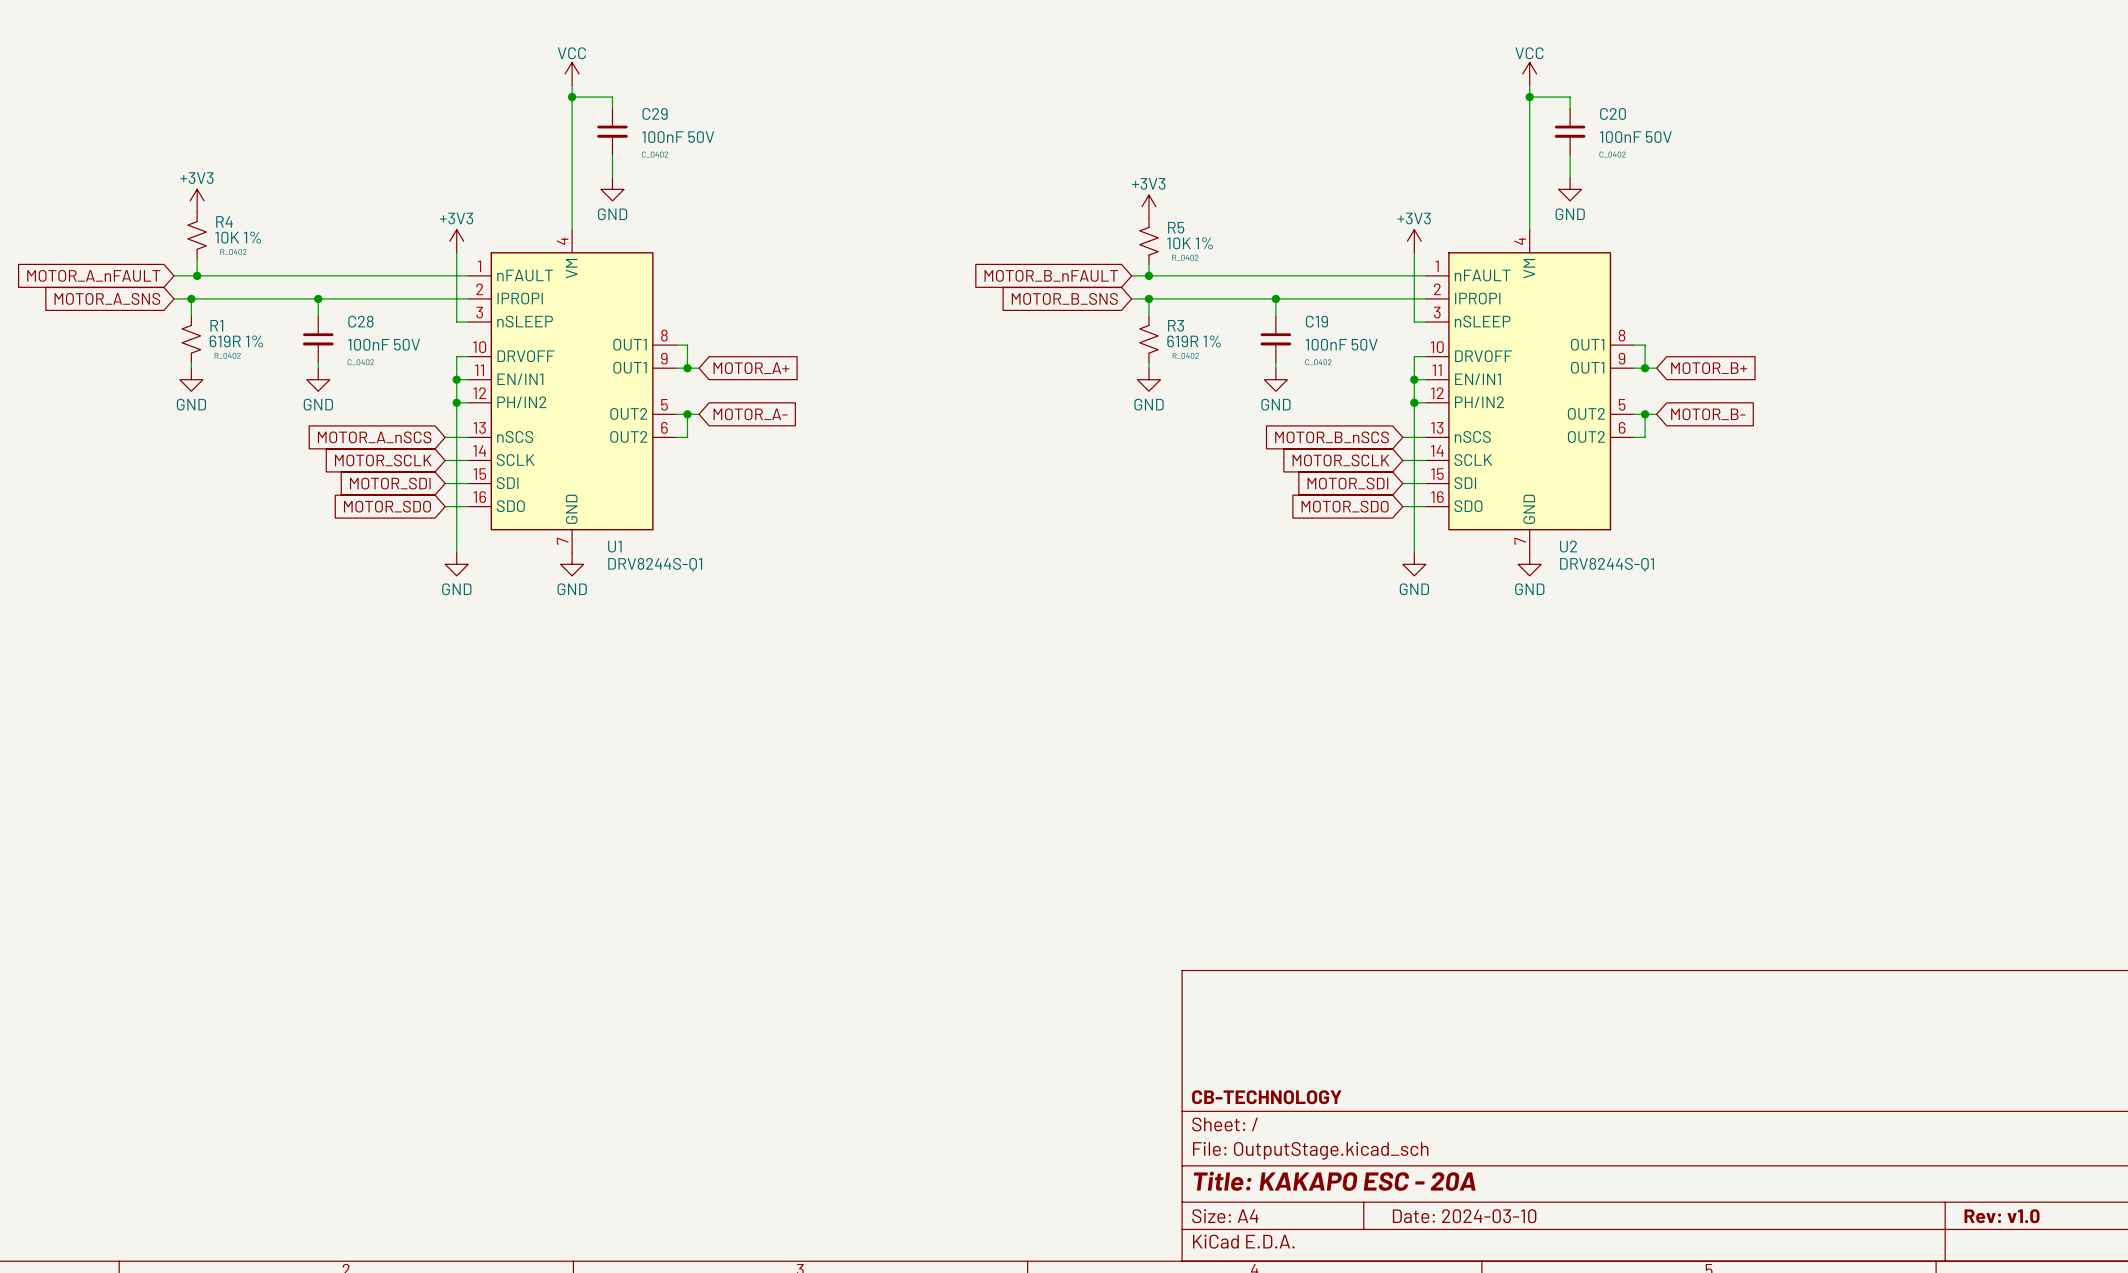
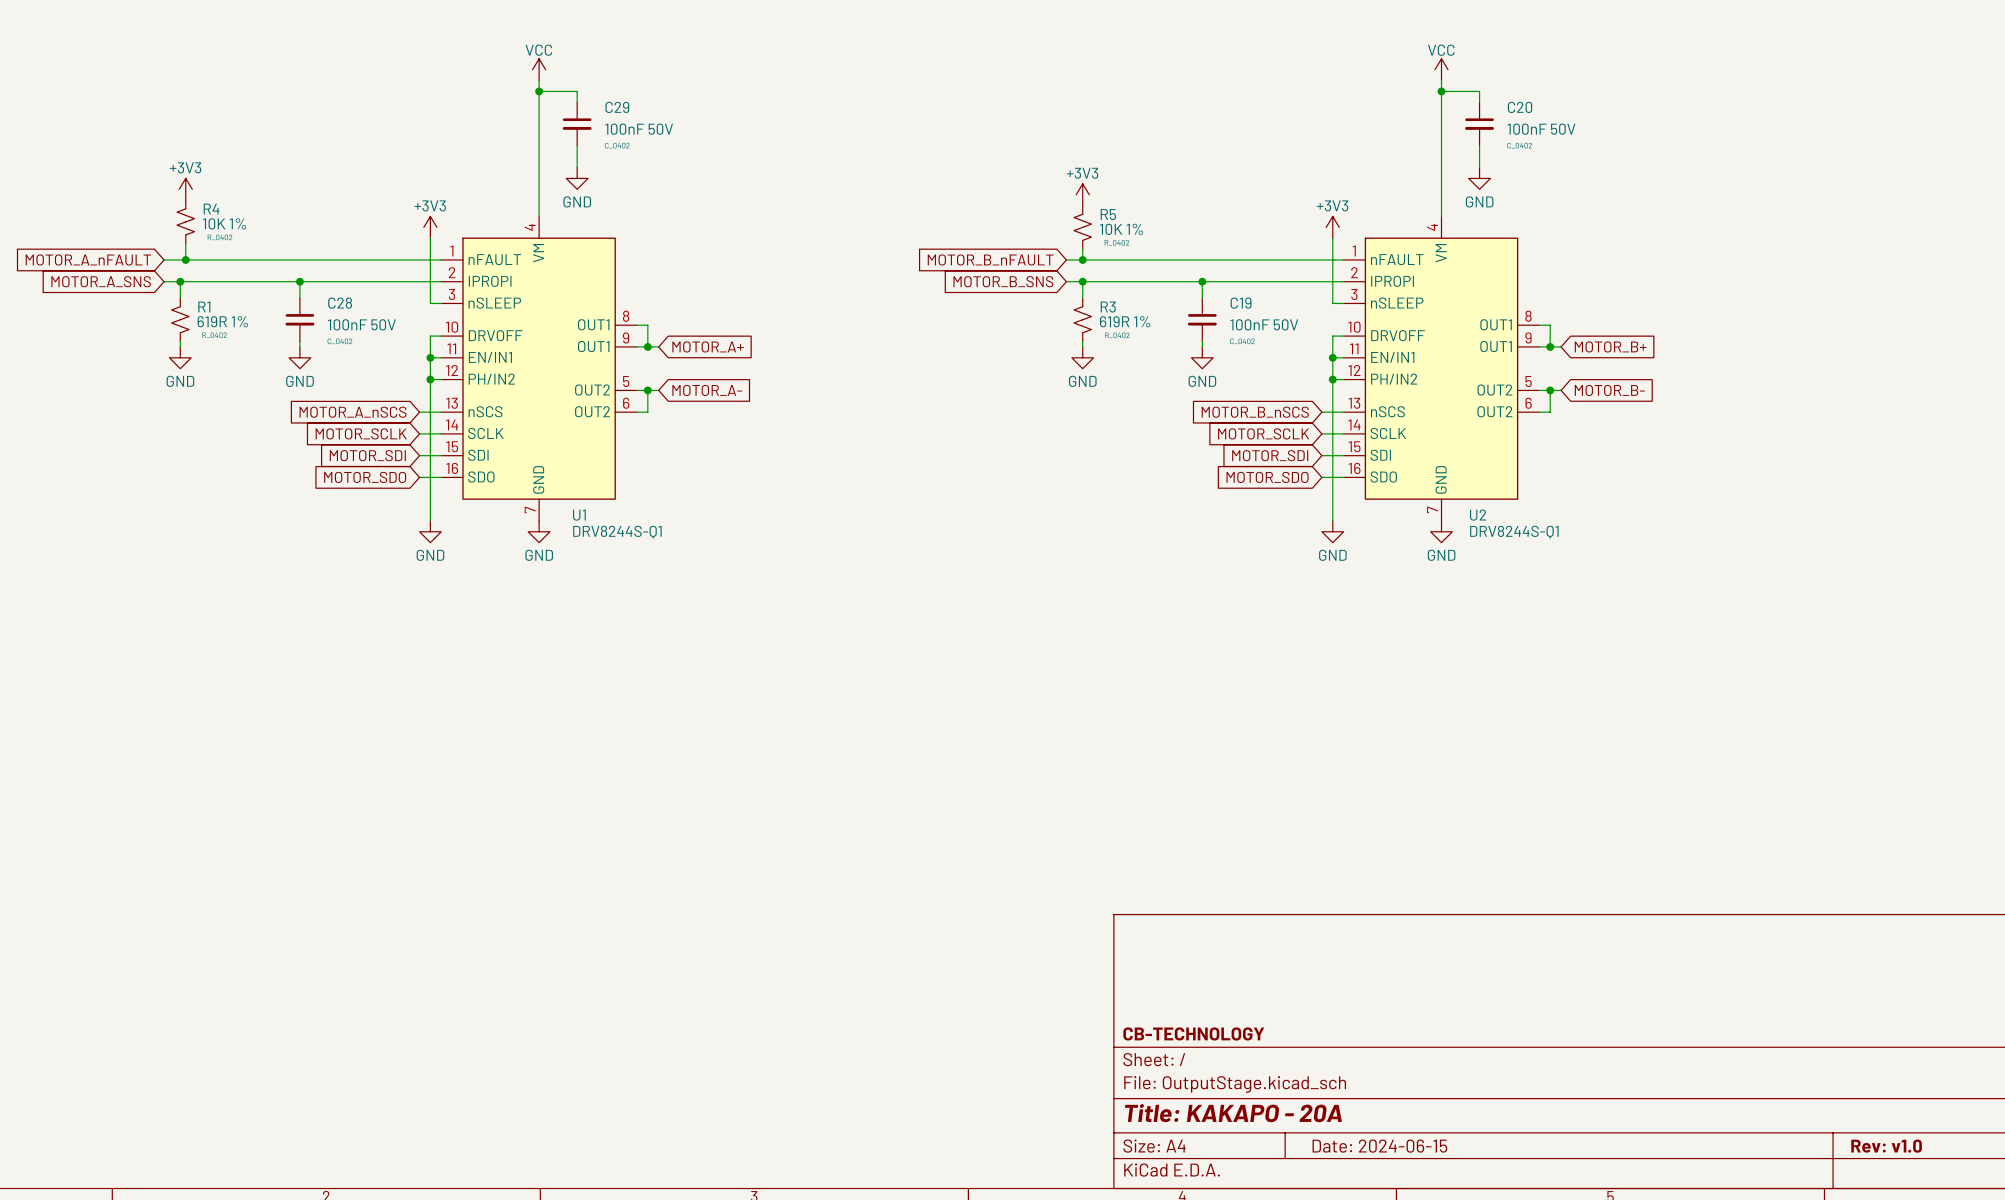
title block: Title: KAKAPO ESC - 20A (1334, 1181) -> Title: KAKAPO - 20A (1233, 1113)
title block: Date: 2024-03-10 (1464, 1216) -> Date: 2024-06-15 (1379, 1146)

